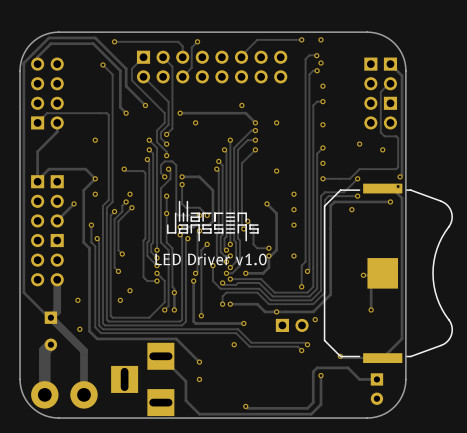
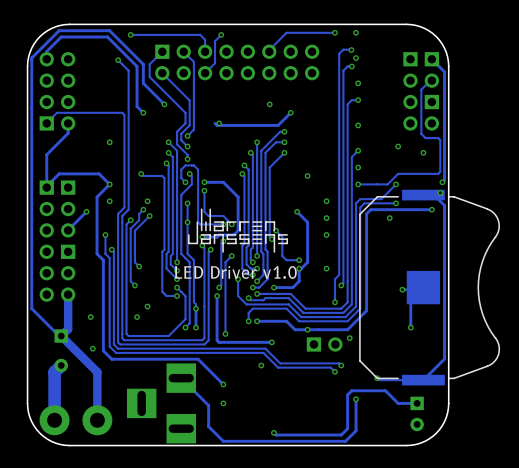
track: (180, 113) (245, 113) (255, 122) -> none
via: (180, 113) -> none
track: none -> (290, 112) (278, 125) (217, 125) (214, 123)
via: none -> (290, 112)
via: (255, 122) -> none
via: (276, 122) -> none

